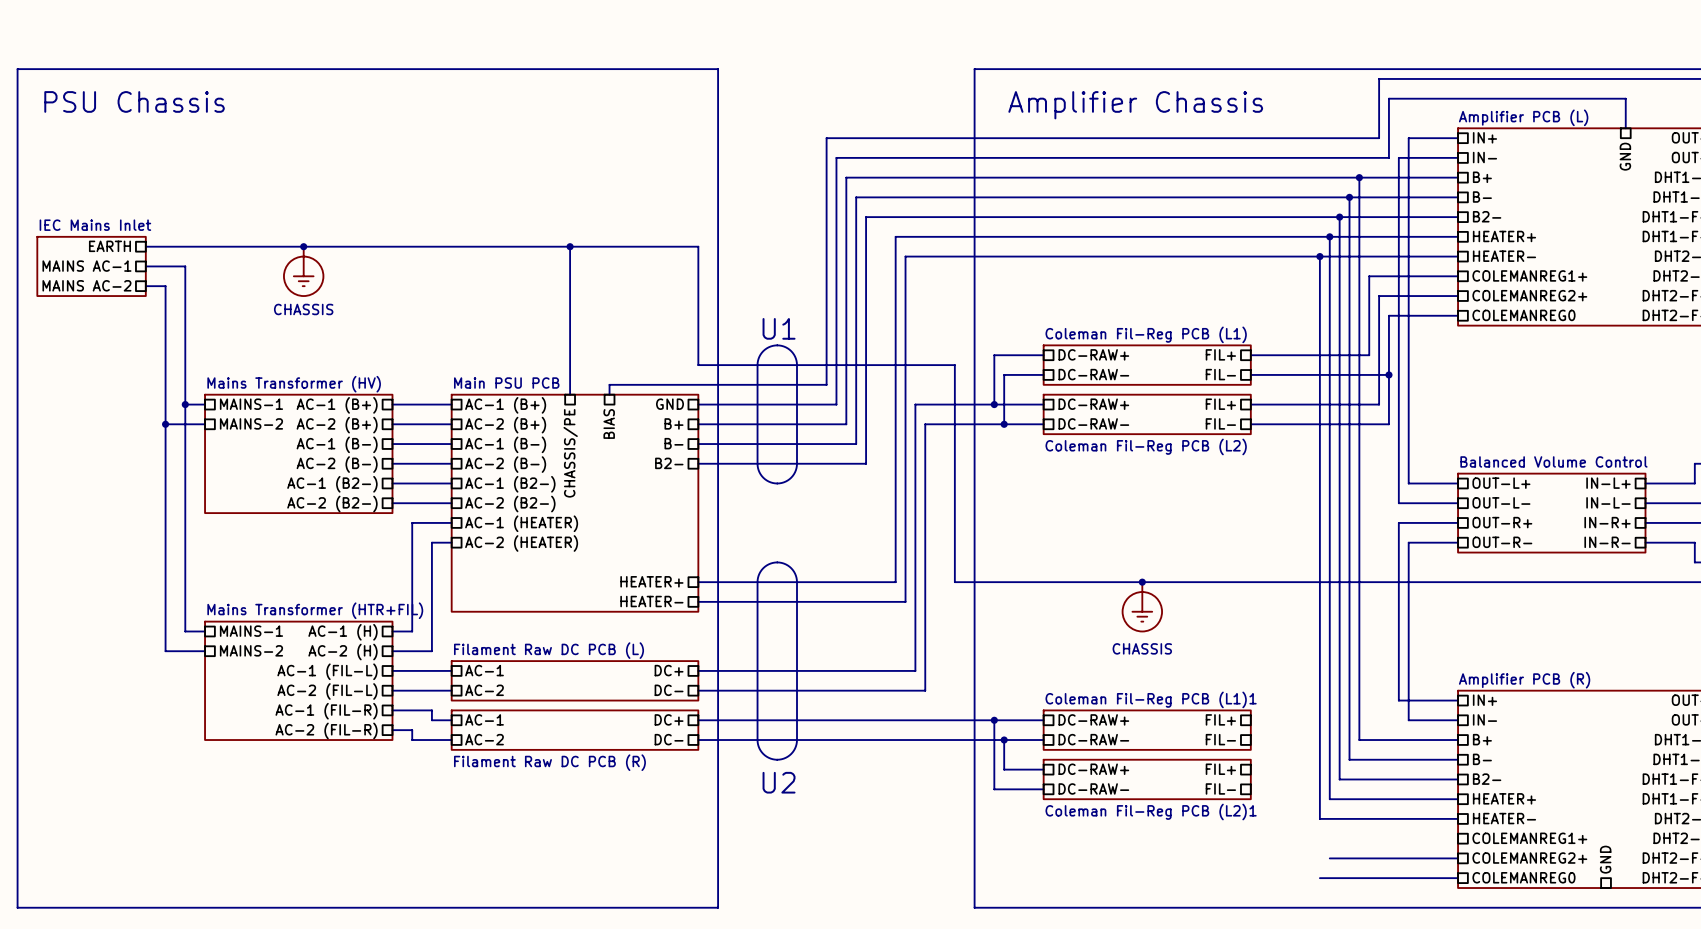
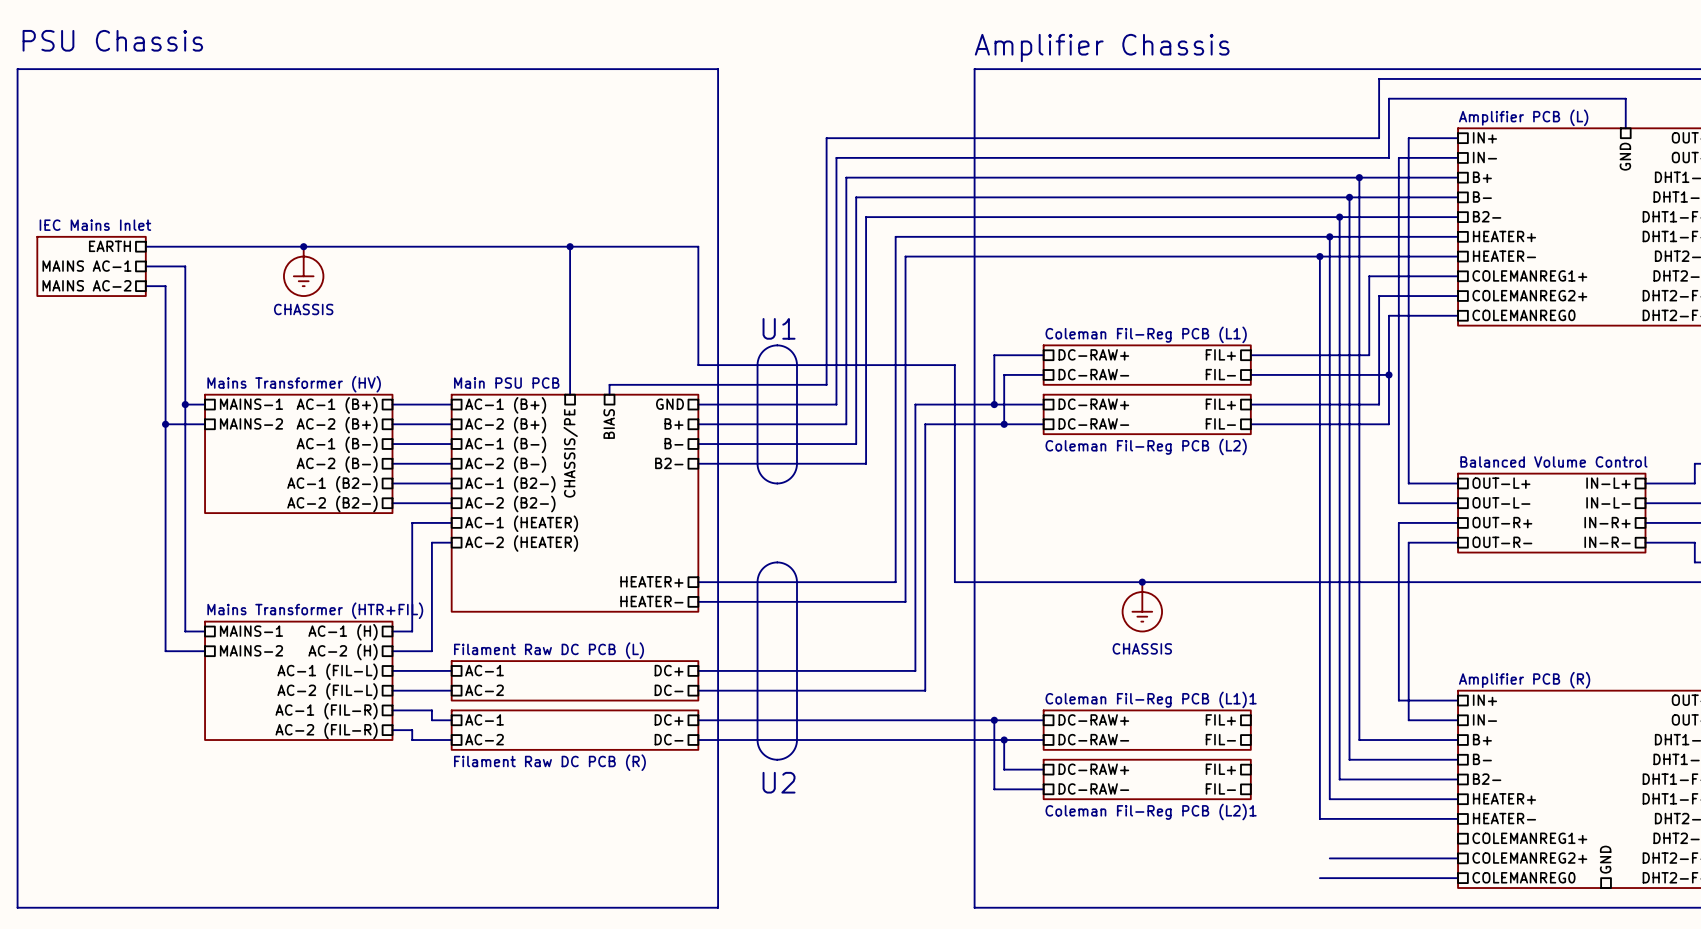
text position: PSU Chassis (134, 101) -> PSU Chassis (112, 40)
text position: Amplifier Chassis (1135, 105) -> Amplifier Chassis (1102, 48)

